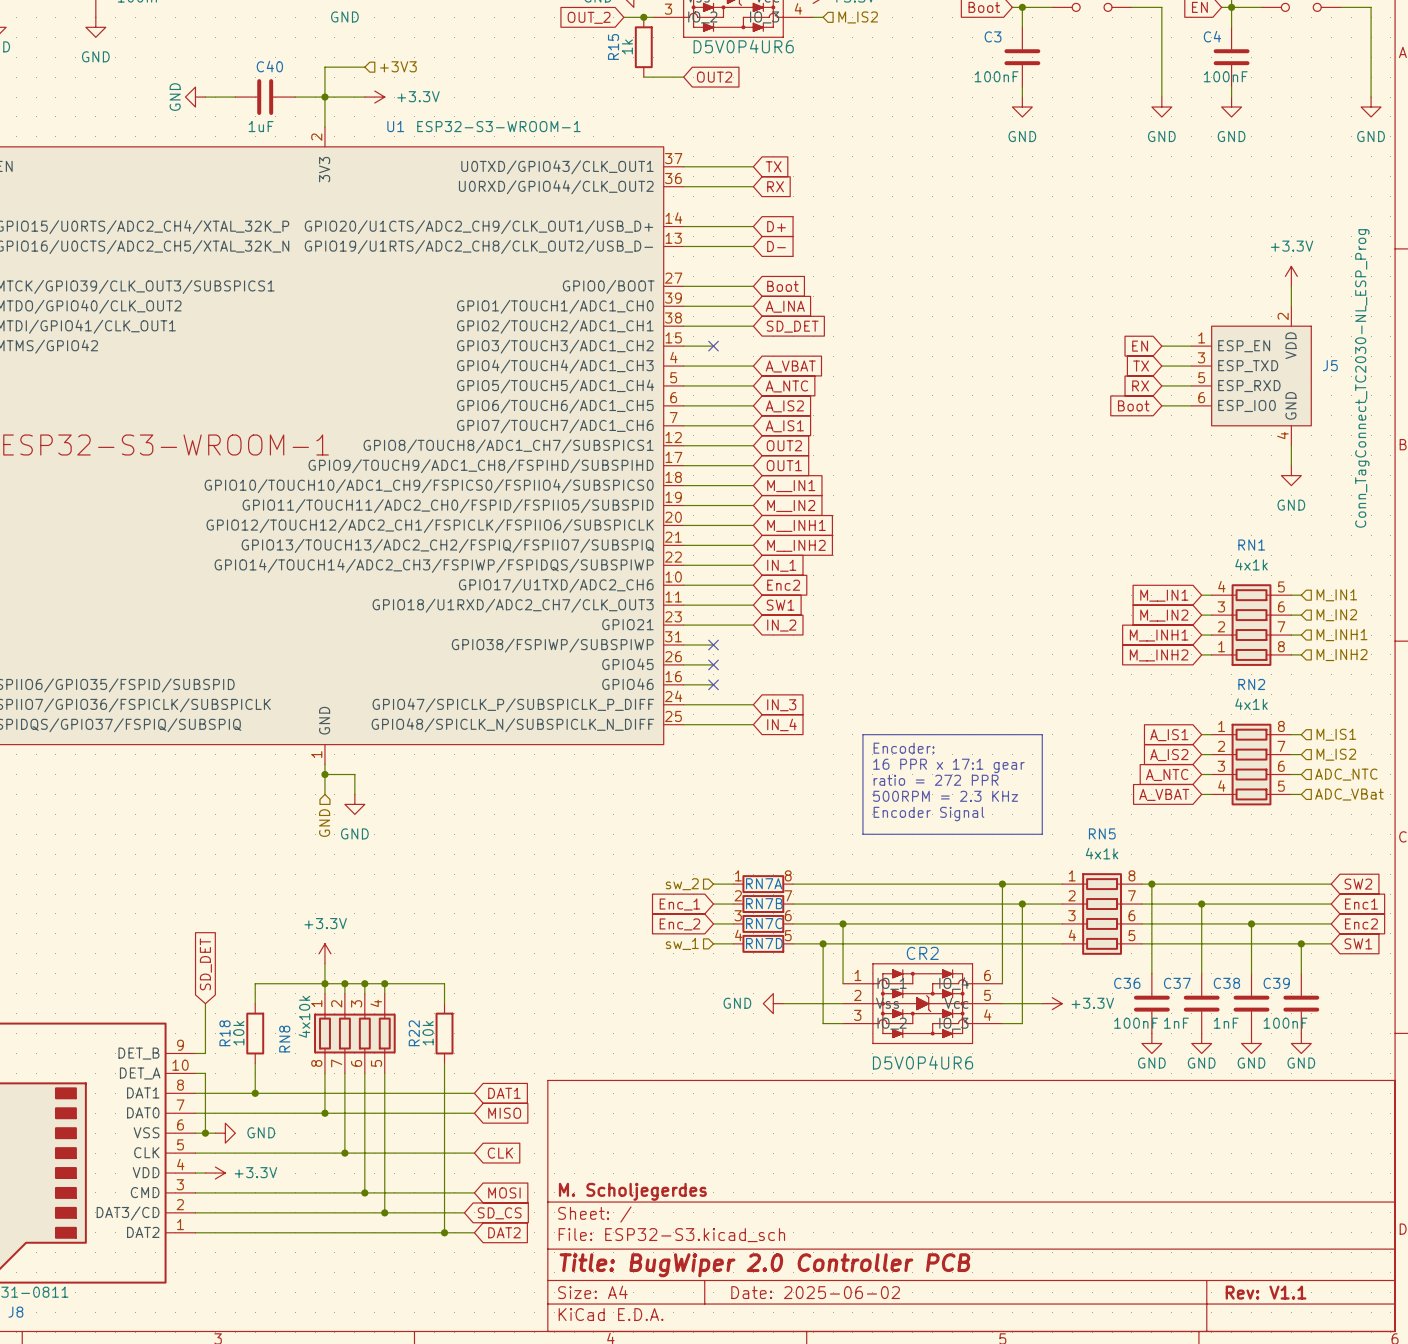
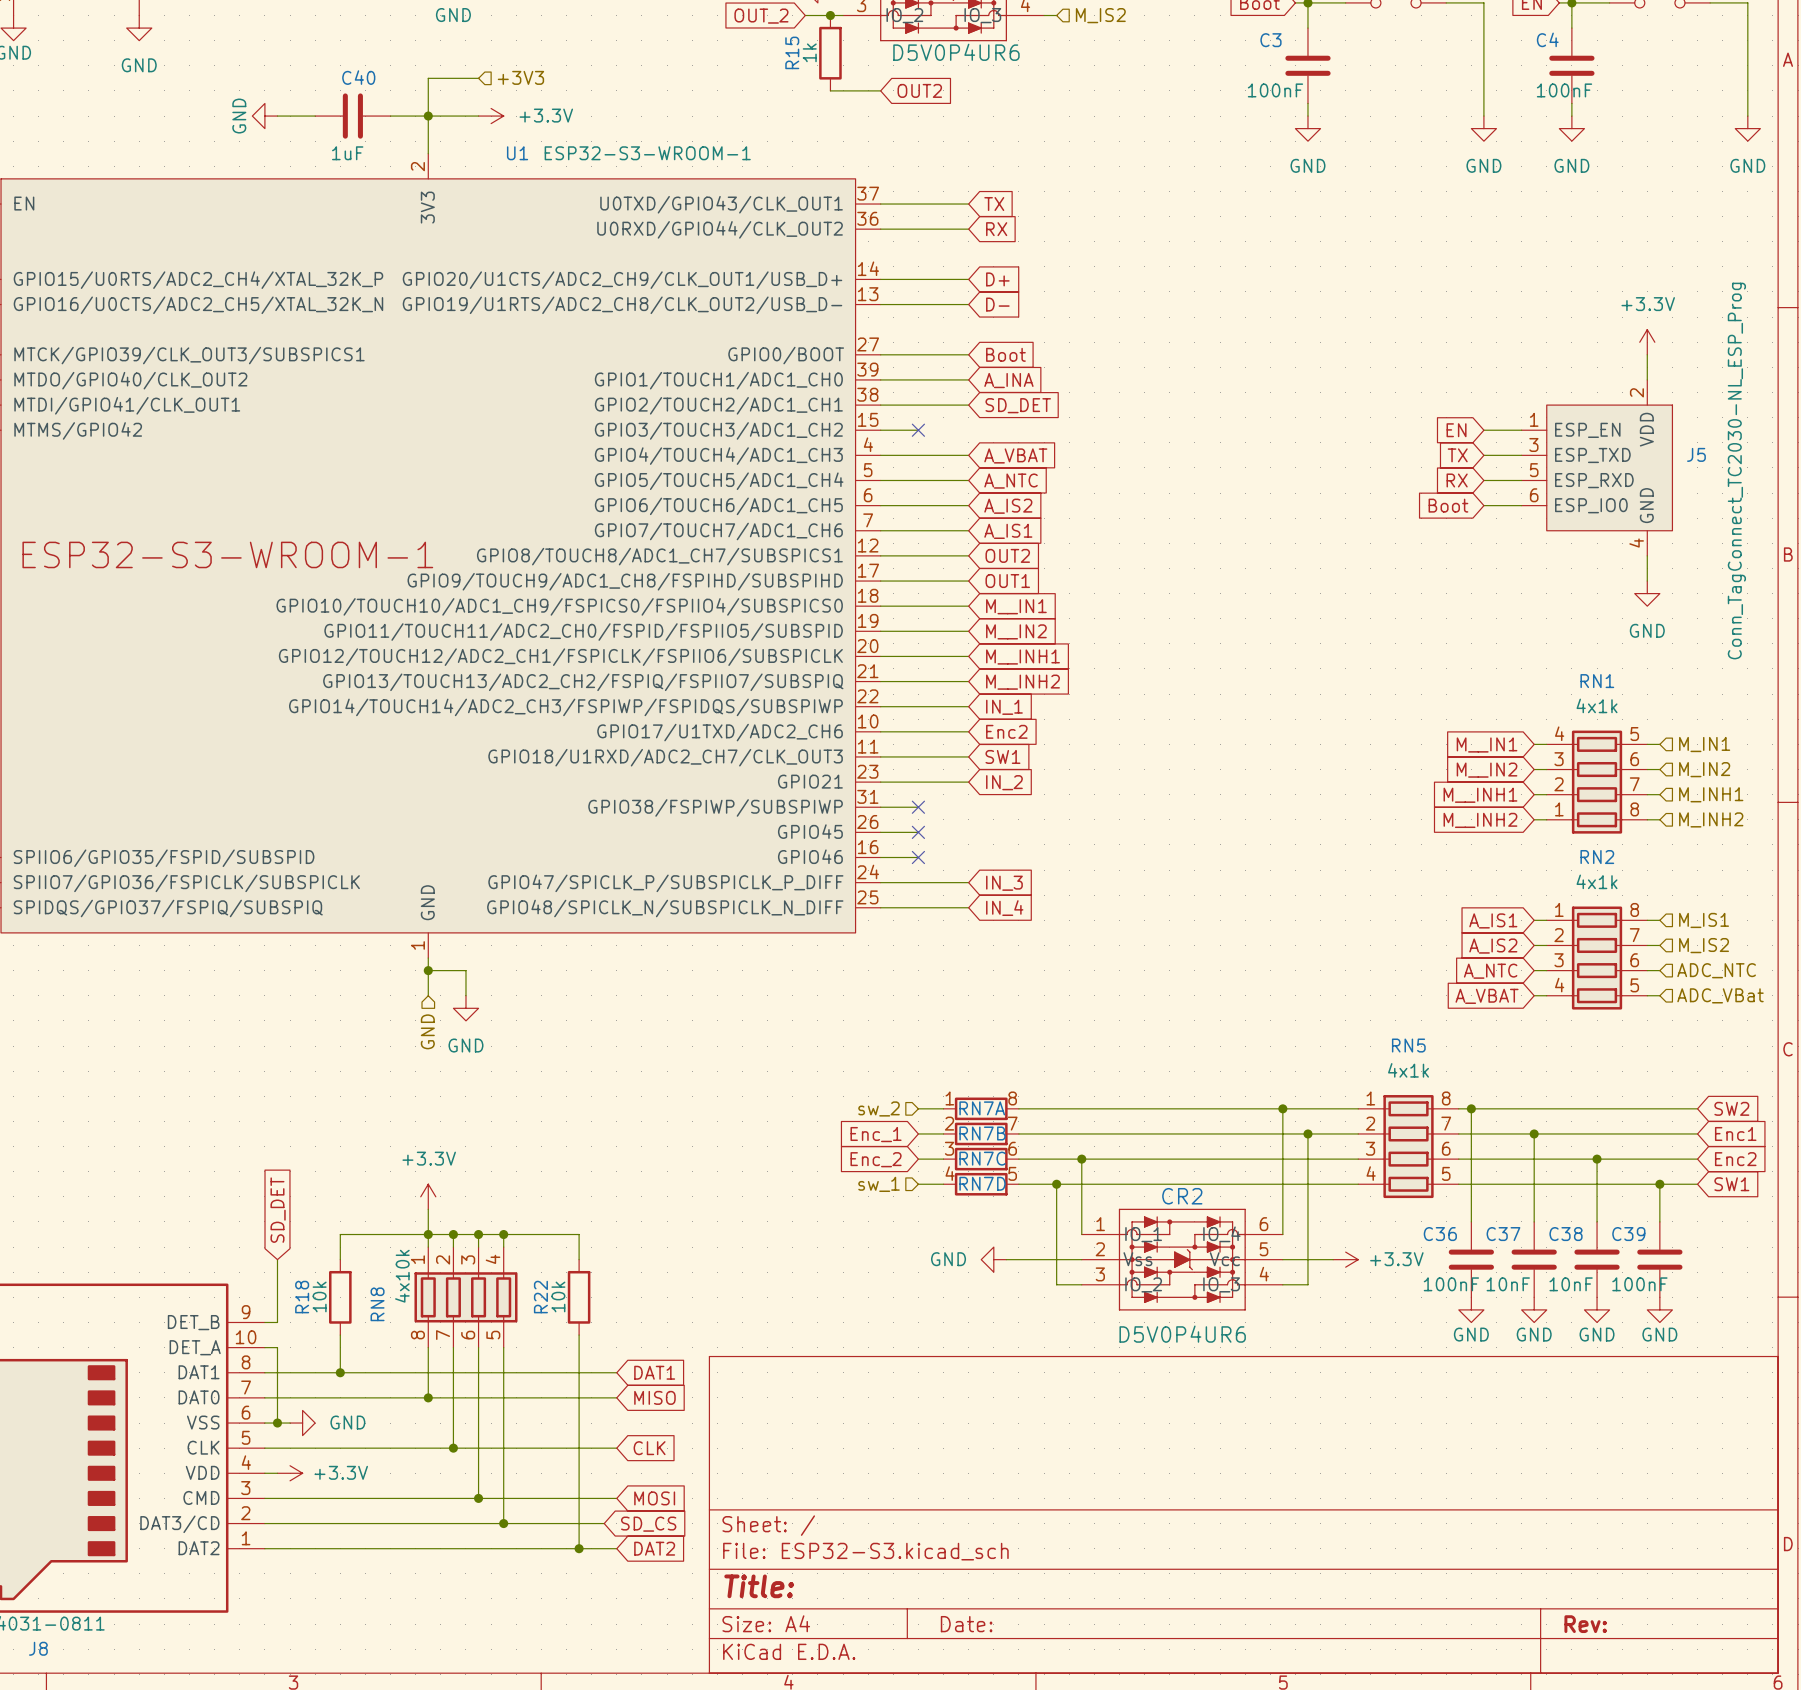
line: (862, 734) (1042, 734) (1042, 834) (862, 834) (862, 734) -> none
text: Encoder: (904, 748) -> none
text: 16 PPR x 17:1 gear (948, 765) -> none
text: ratio = 272 PPR (936, 780) -> none
text: 500RPM = 2.3 KHz (945, 796) -> none
text: Encoder Signal (928, 814) -> none
C37 value: 1nF (1176, 1023) -> 10nF (1508, 1284)
C38 value: 1nF (1226, 1023) -> 10nF (1571, 1284)
title block: M. Scholjegerdes (632, 1191) -> none
title block: Title: BugWiper 2.0 Controller PCB (764, 1265) -> Title: (759, 1586)
title block: Date: 2025-06-02 (815, 1292) -> Date: (966, 1624)
title block: Rev: V1.1 (1266, 1292) -> Rev: (1585, 1624)

